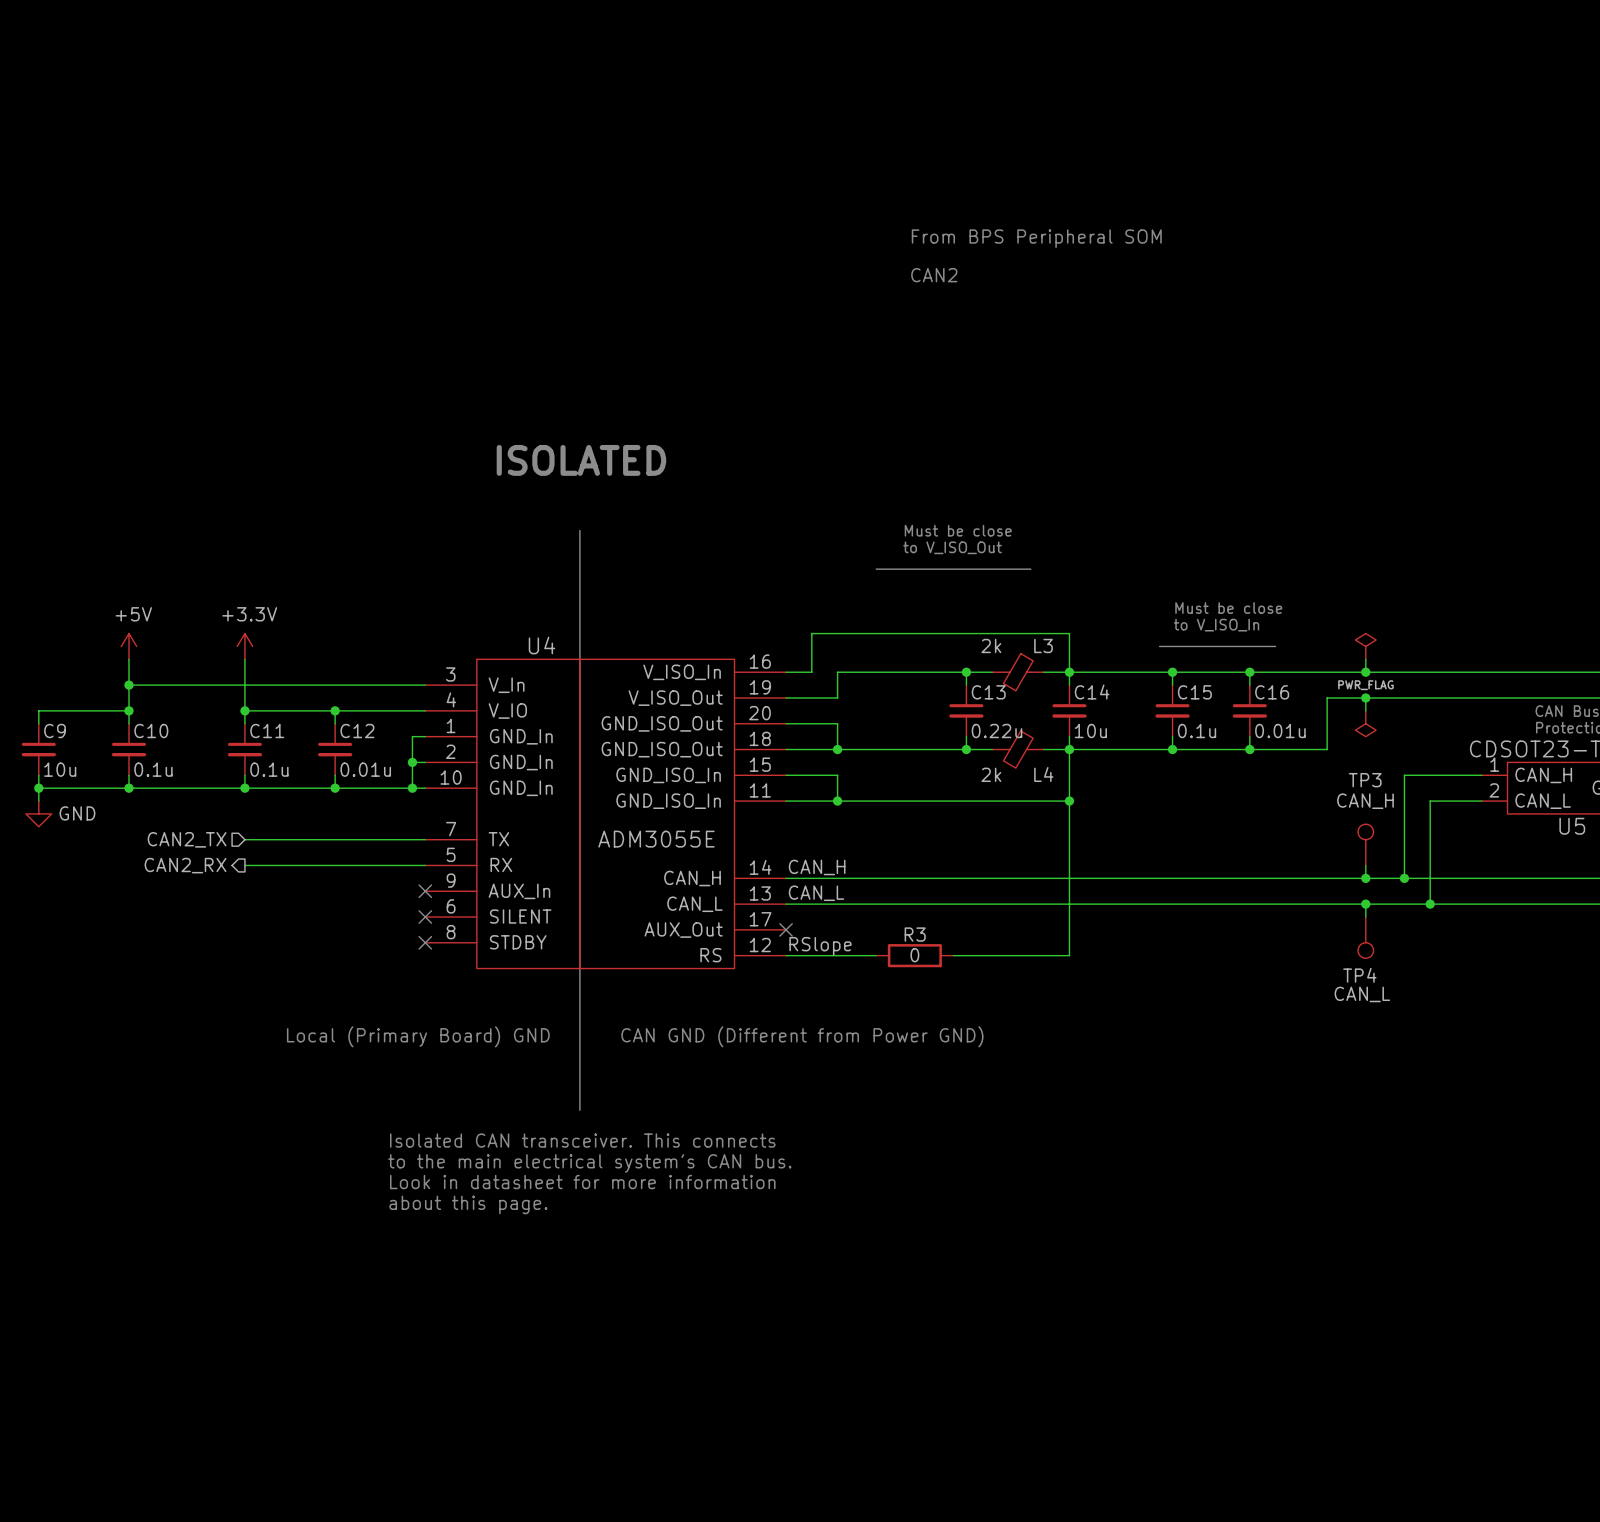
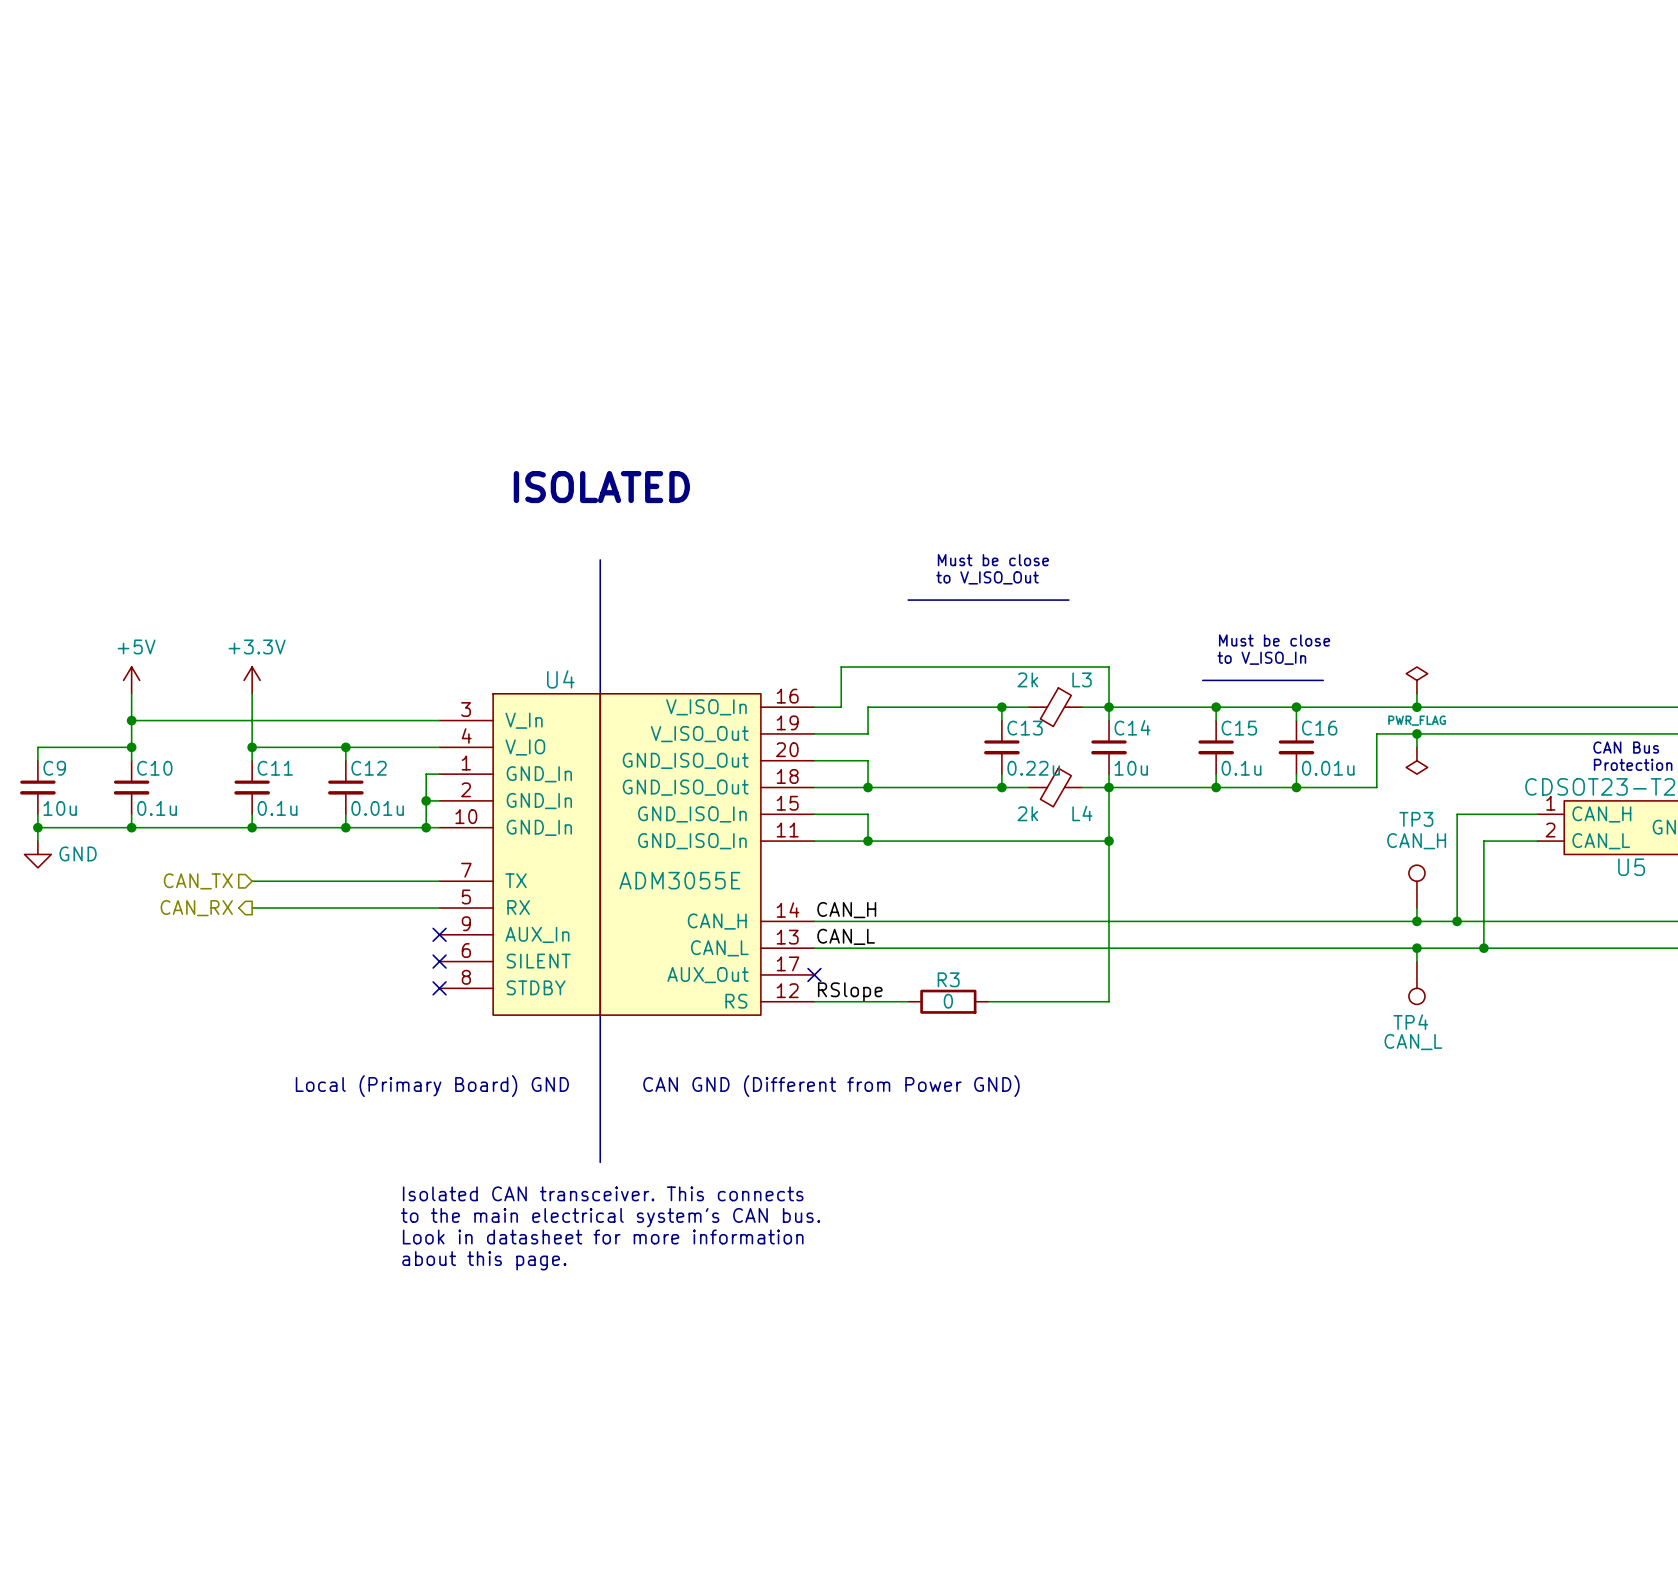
text: From BPS Peripheral SOM (1036, 238) -> none
text: CAN2 (934, 275) -> none
hierarchical label: CAN2_TX (187, 839) -> CAN_TX (198, 881)
hierarchical label: CAN2_RX (185, 865) -> CAN_RX (196, 908)

